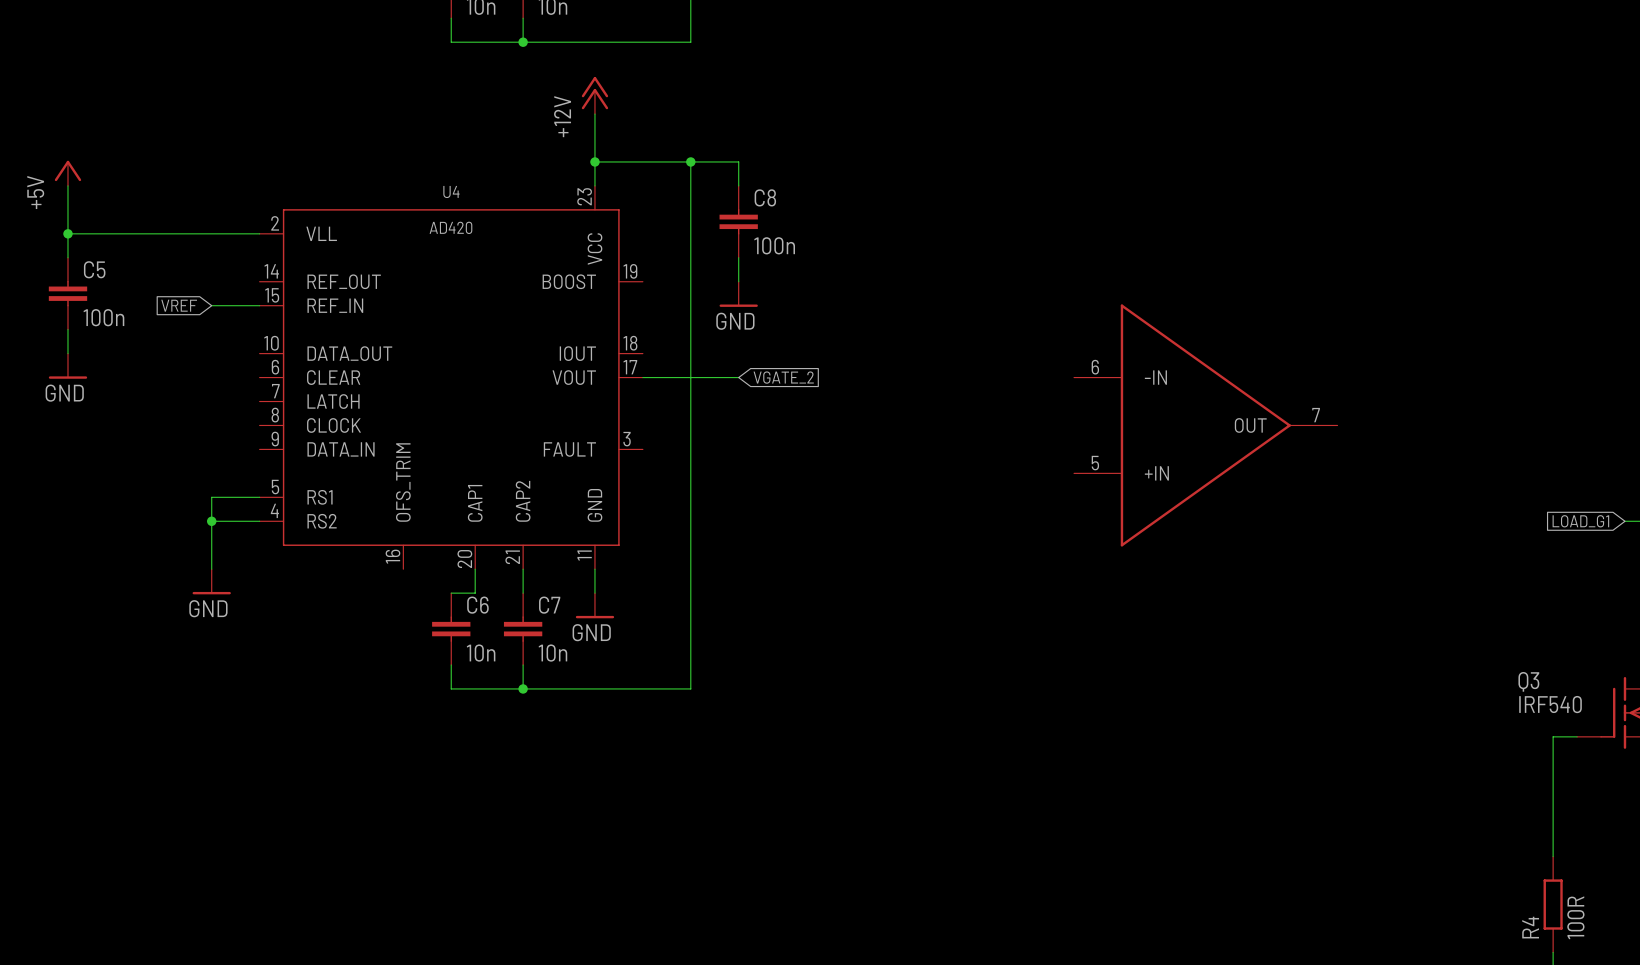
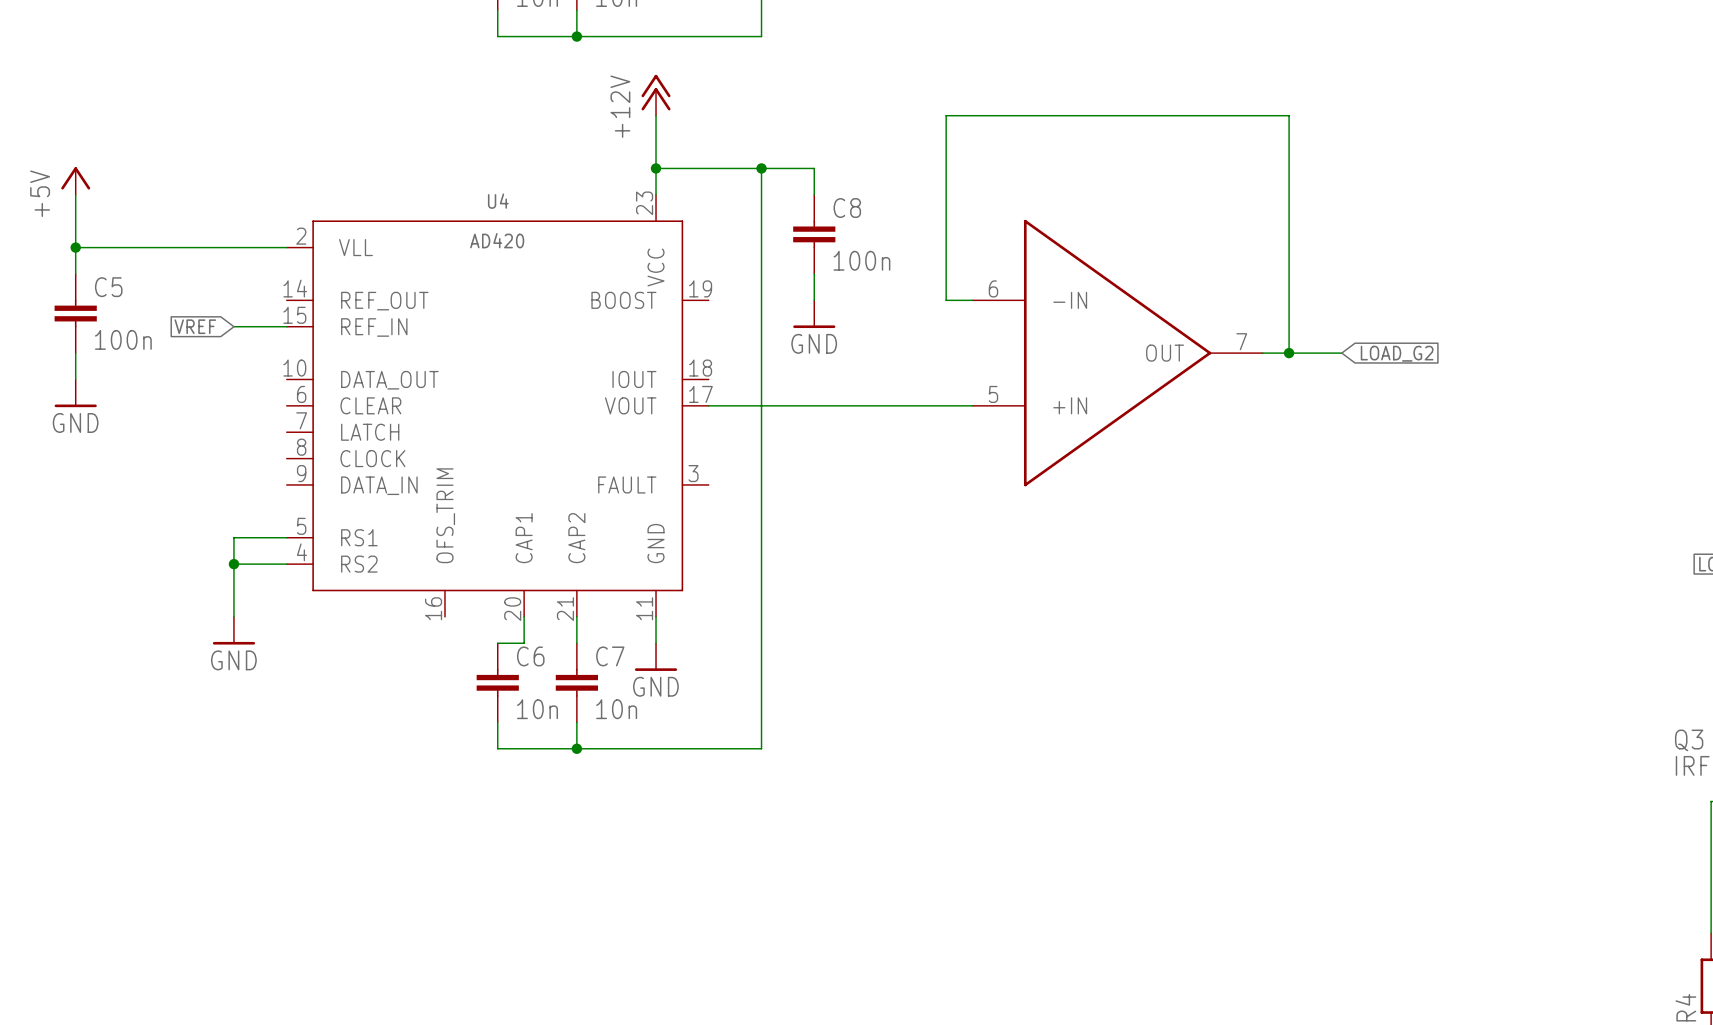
wire: none -> (972, 300) (946, 300) (946, 115) (1289, 115) (1289, 353)
wire: none -> (1262, 353) (1341, 353)
junction: none -> (1289, 353)
global label: none -> LOAD_G2 (1397, 353)
wire: none -> (814, 405) (972, 405)
global label: VGATE_2 (783, 377) -> none
part position: (1205, 425) -> (1117, 353)

